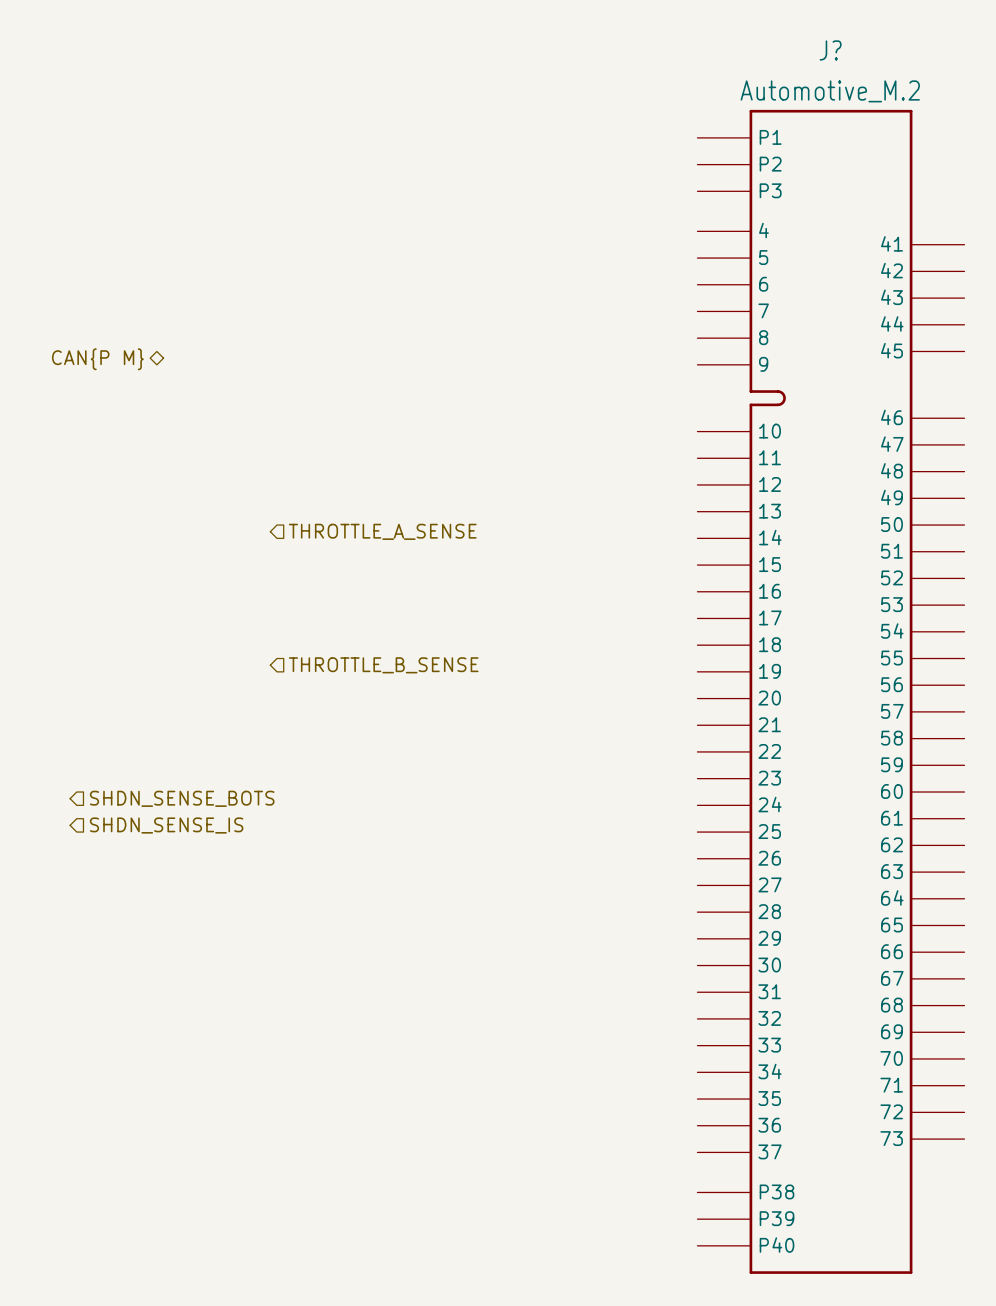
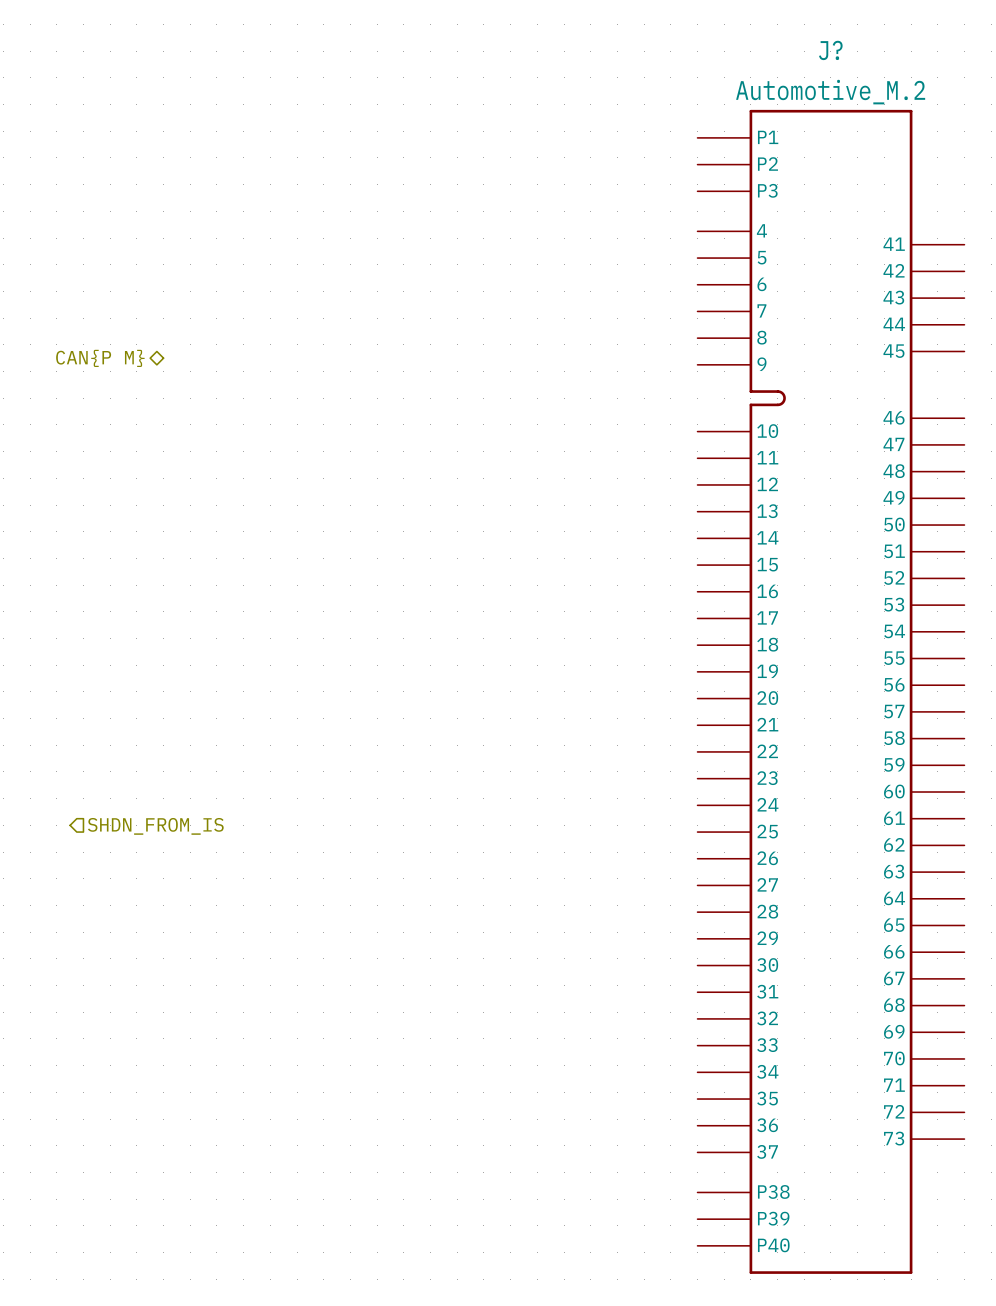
hierarchical label: THROTTLE_A_SENSE (382, 531) -> none
hierarchical label: THROTTLE_B_SENSE (383, 665) -> none
hierarchical label: SHDN_SENSE_BOTS (182, 798) -> none
hierarchical label: SHDN_SENSE_IS (166, 825) -> SHDN_FROM_IS (155, 826)

